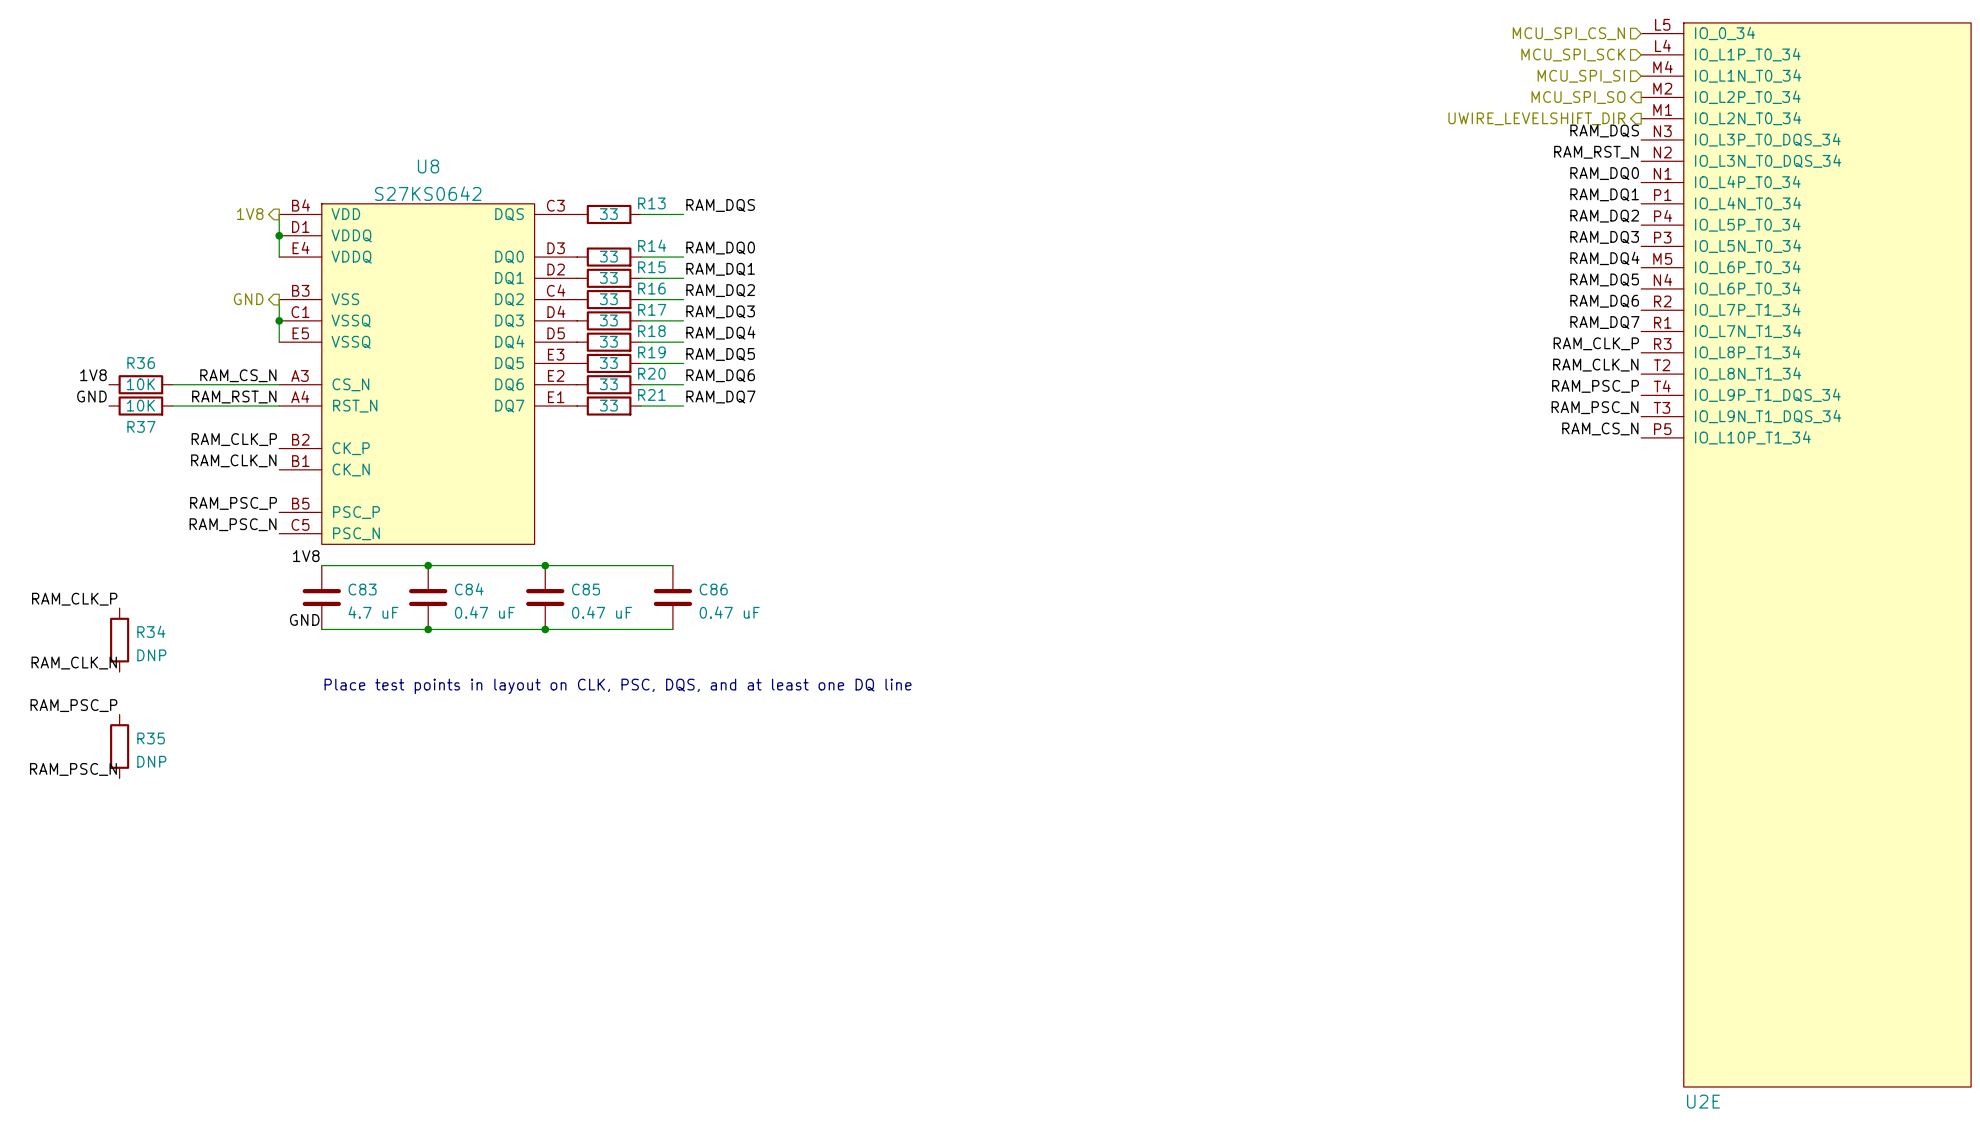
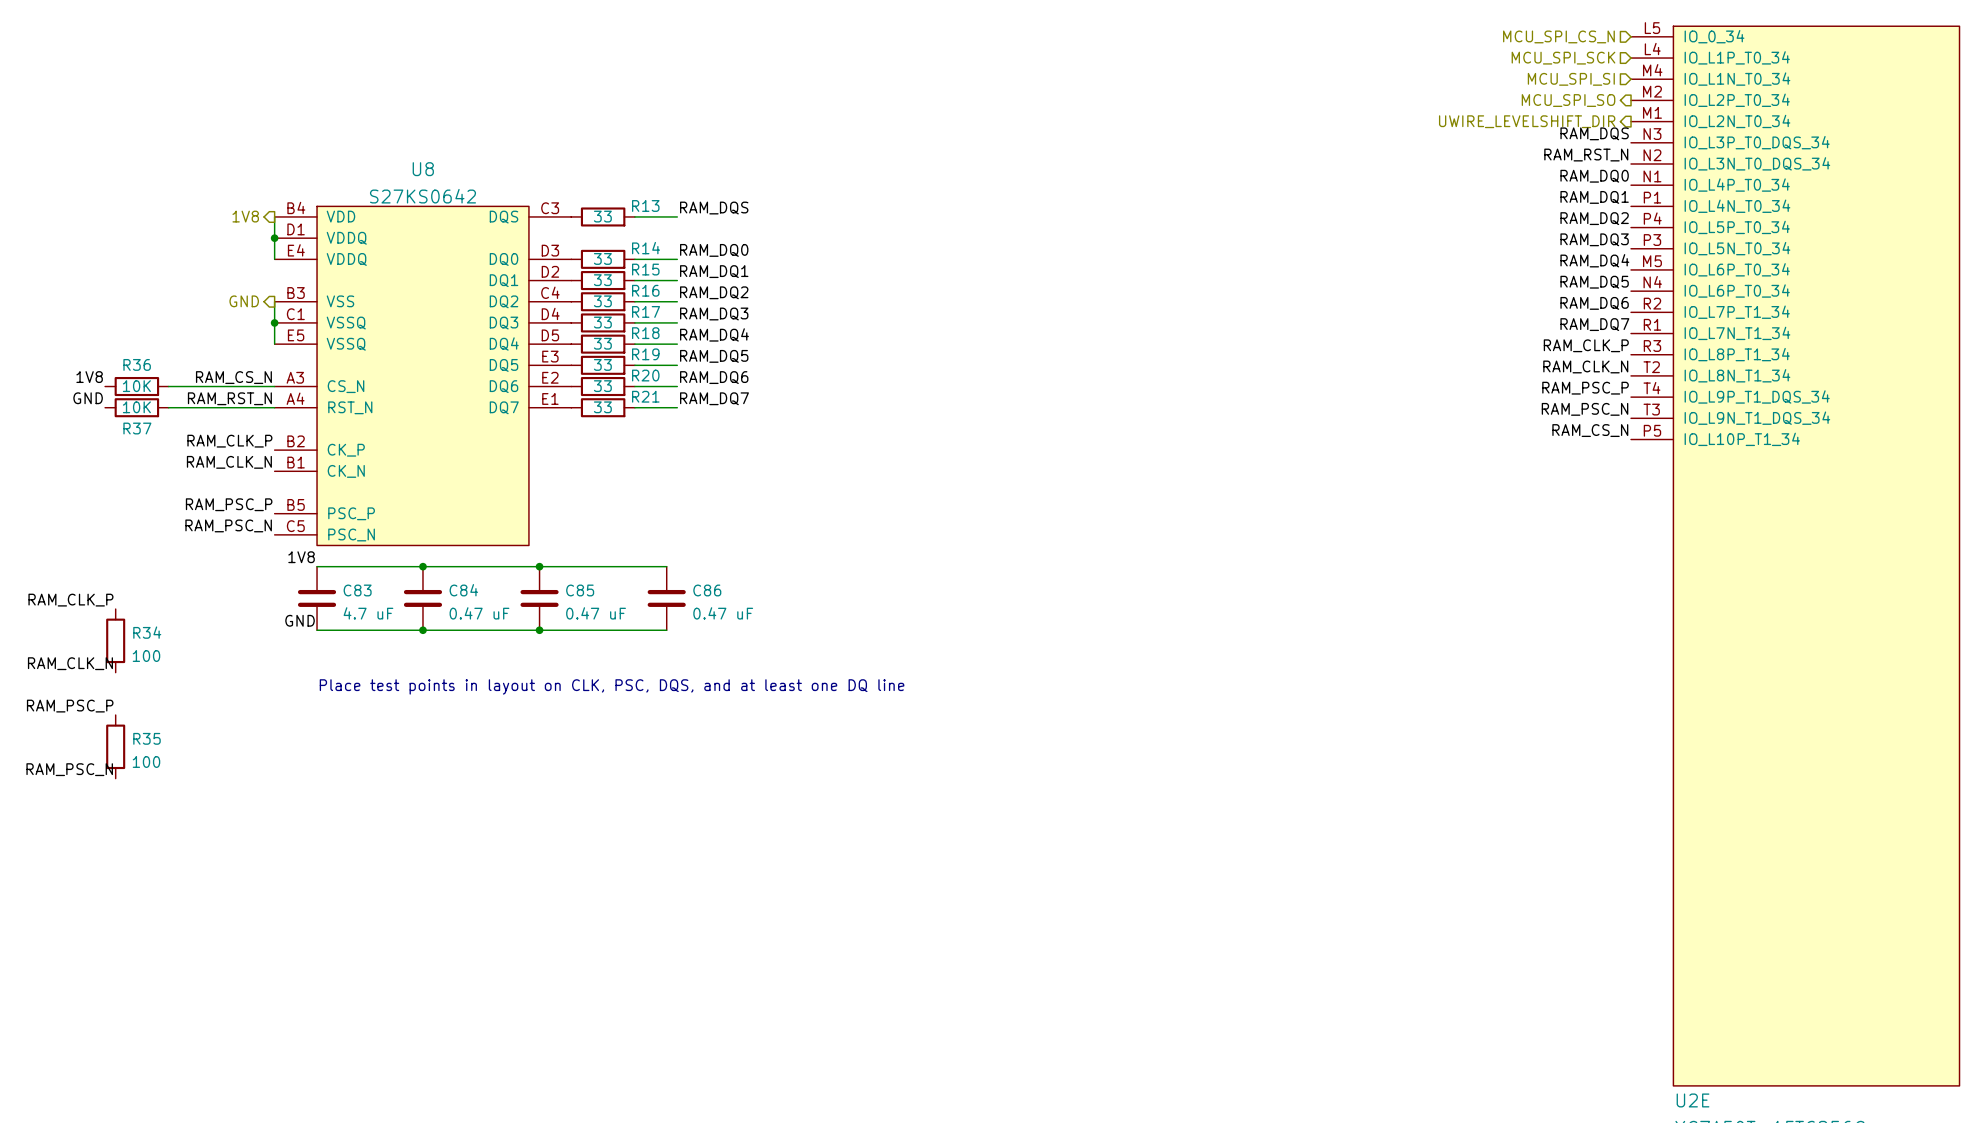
R34 value: DNP (151, 655) -> 100 (146, 656)
R35 value: DNP (151, 761) -> 100 (146, 761)

